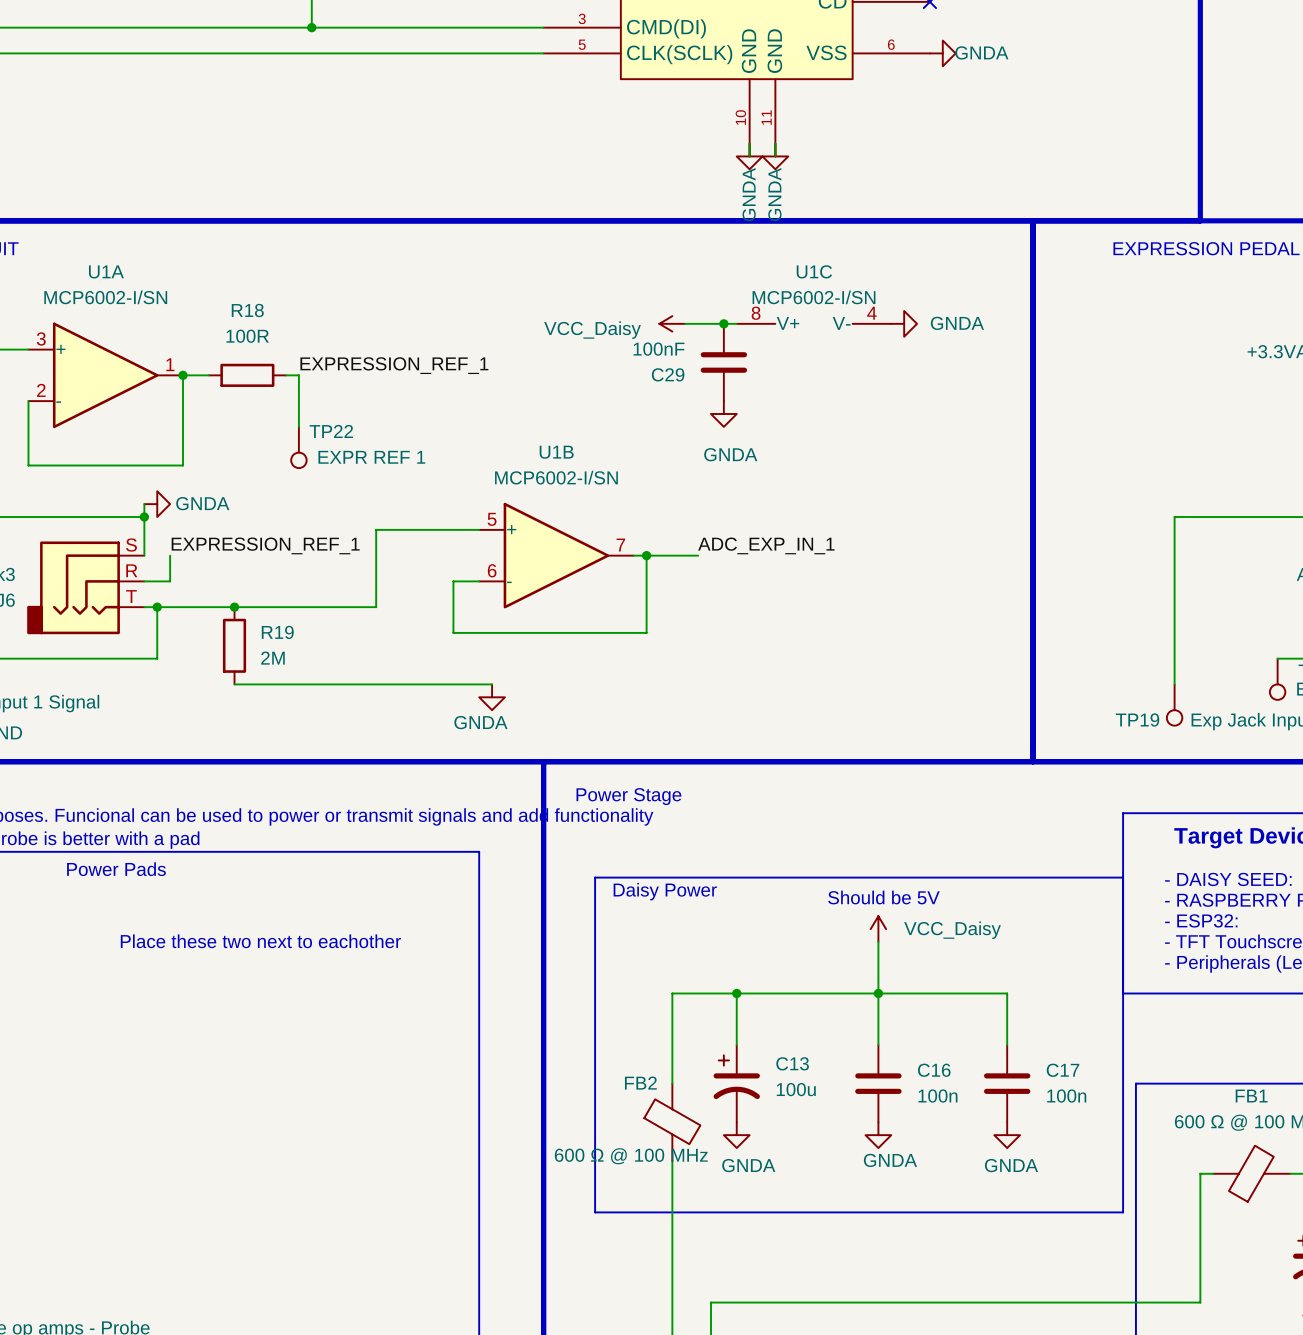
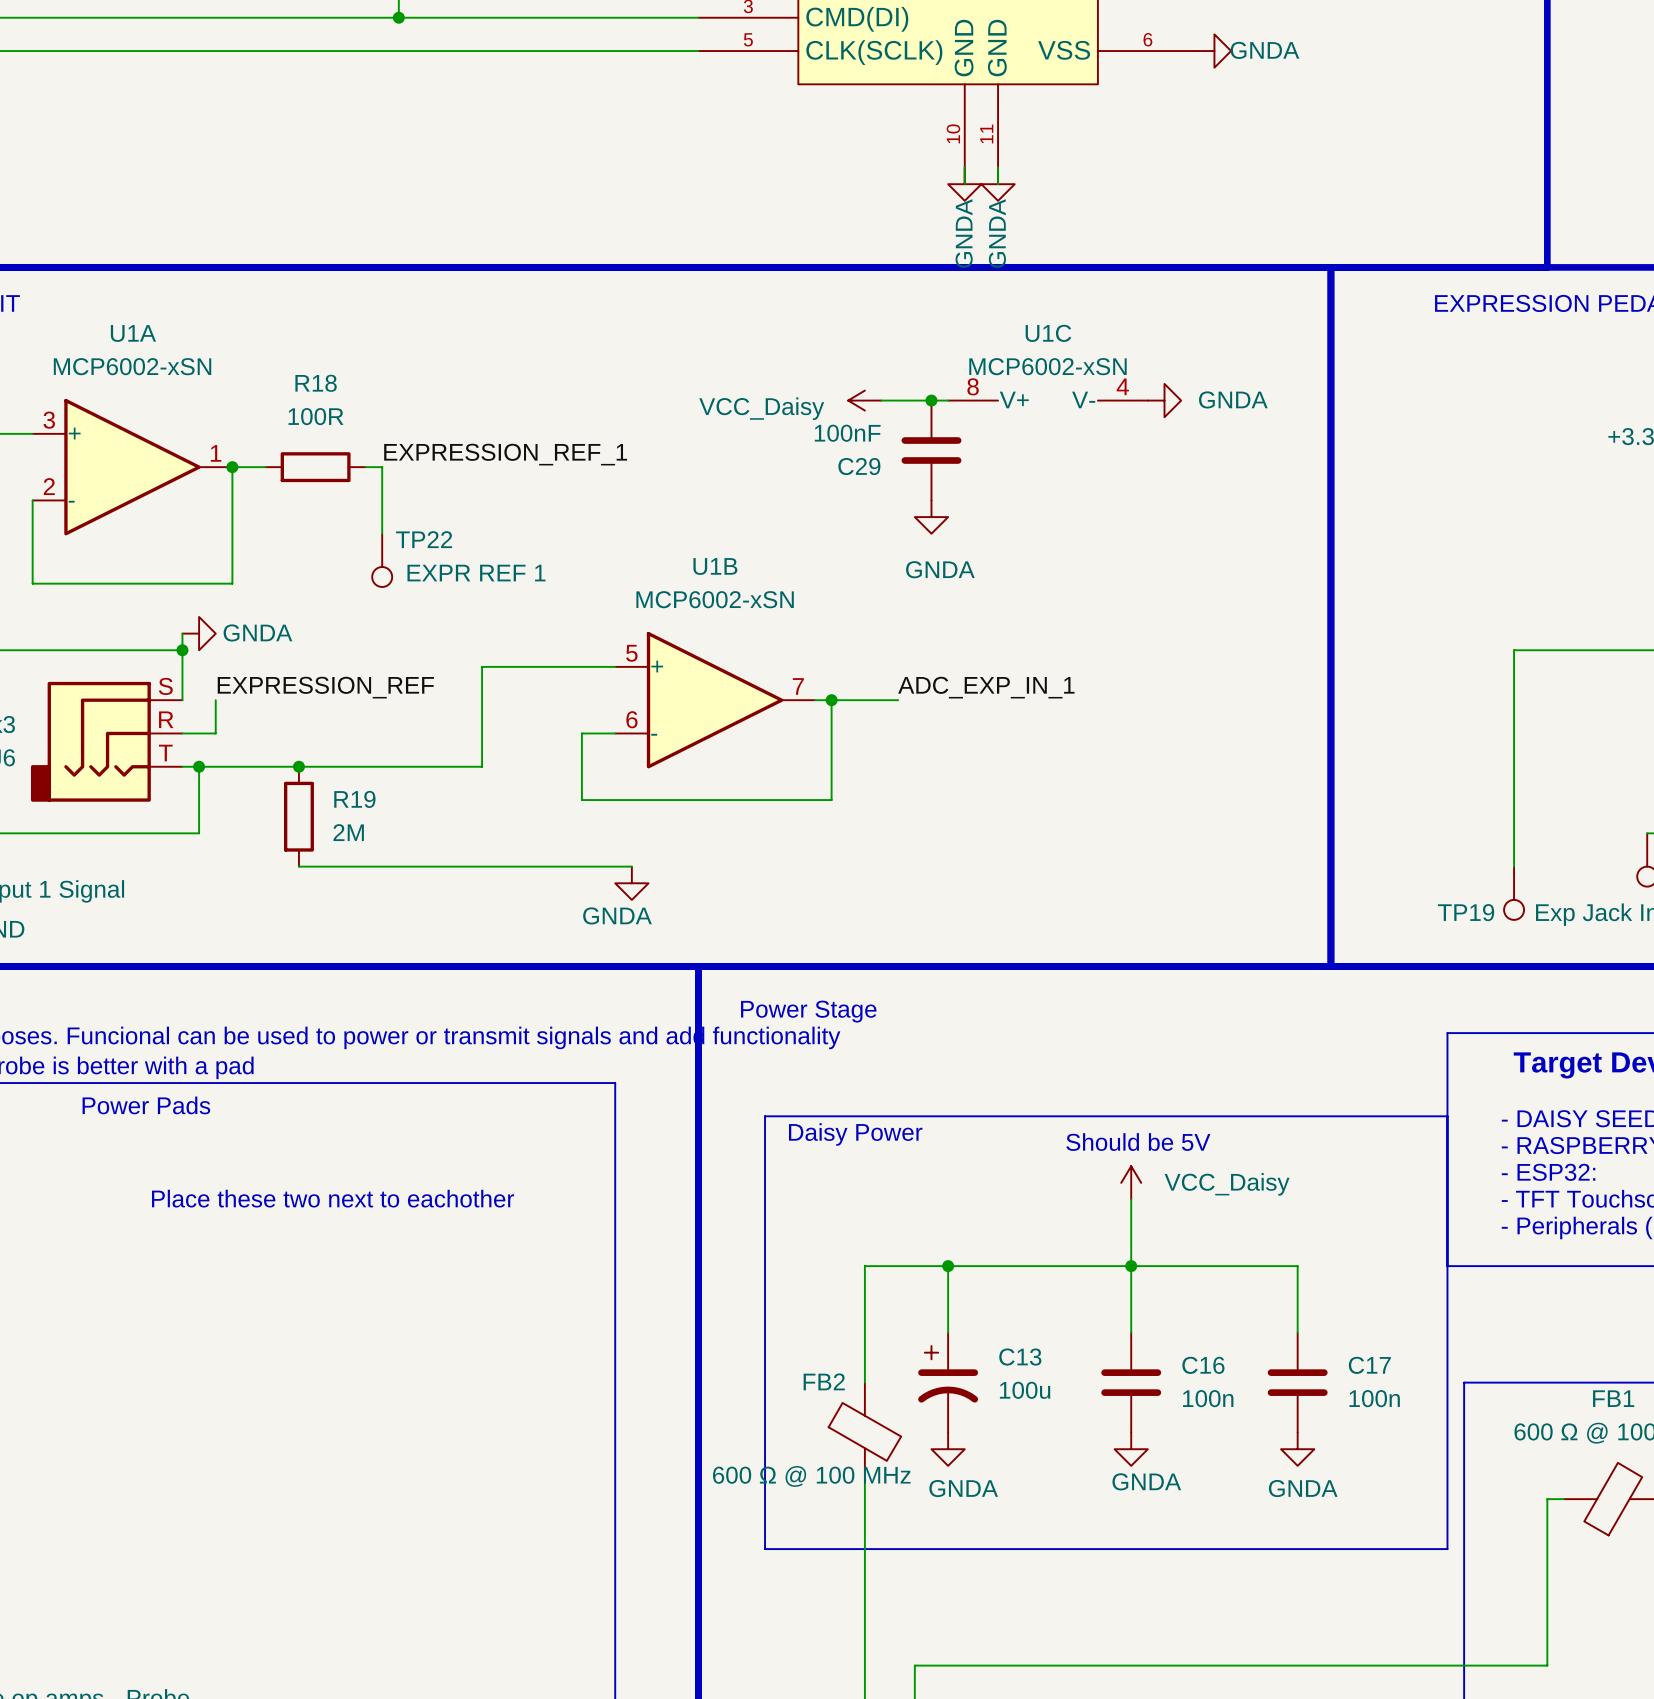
U1A value: MCP6002-I/SN (105, 297) -> MCP6002-xSN (132, 366)
U1C value: MCP6002-I/SN (814, 297) -> MCP6002-xSN (1048, 366)
U1B value: MCP6002-I/SN (556, 477) -> MCP6002-xSN (715, 599)
label: EXPRESSION_REF_1 (265, 545) -> EXPRESSION_REF (325, 687)

